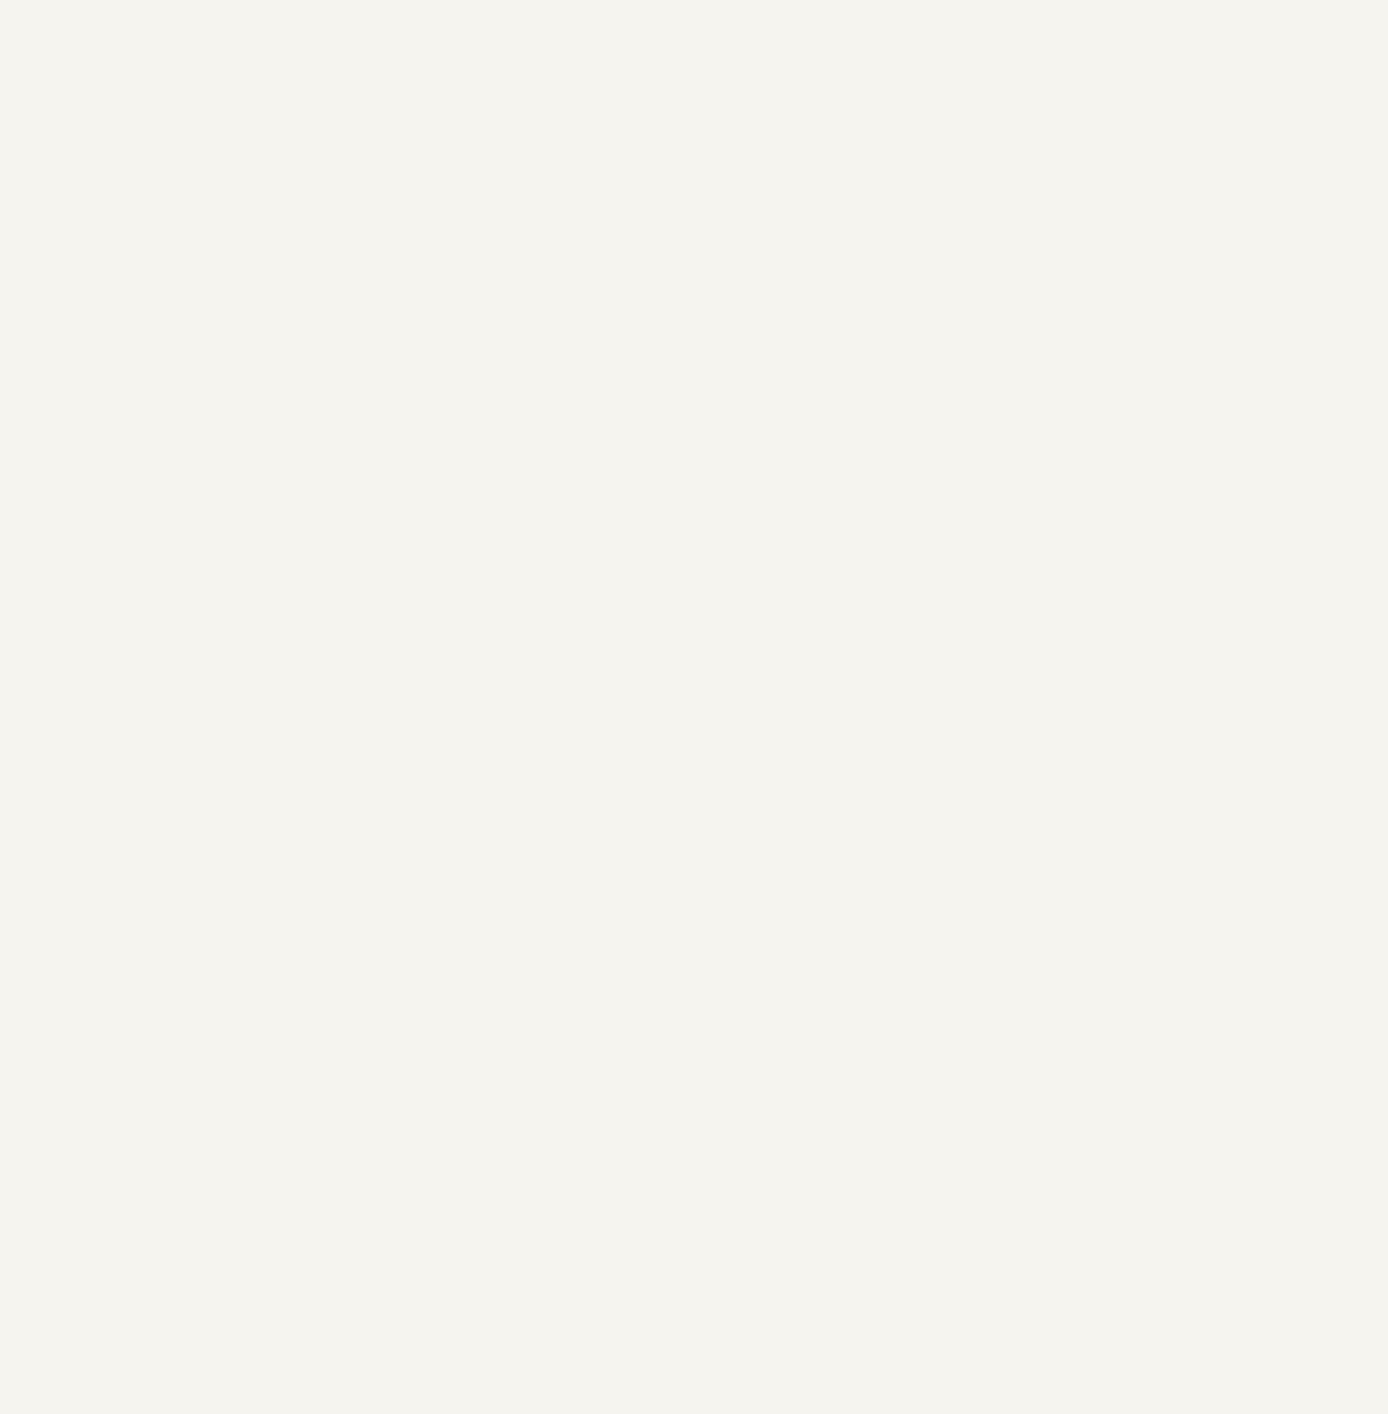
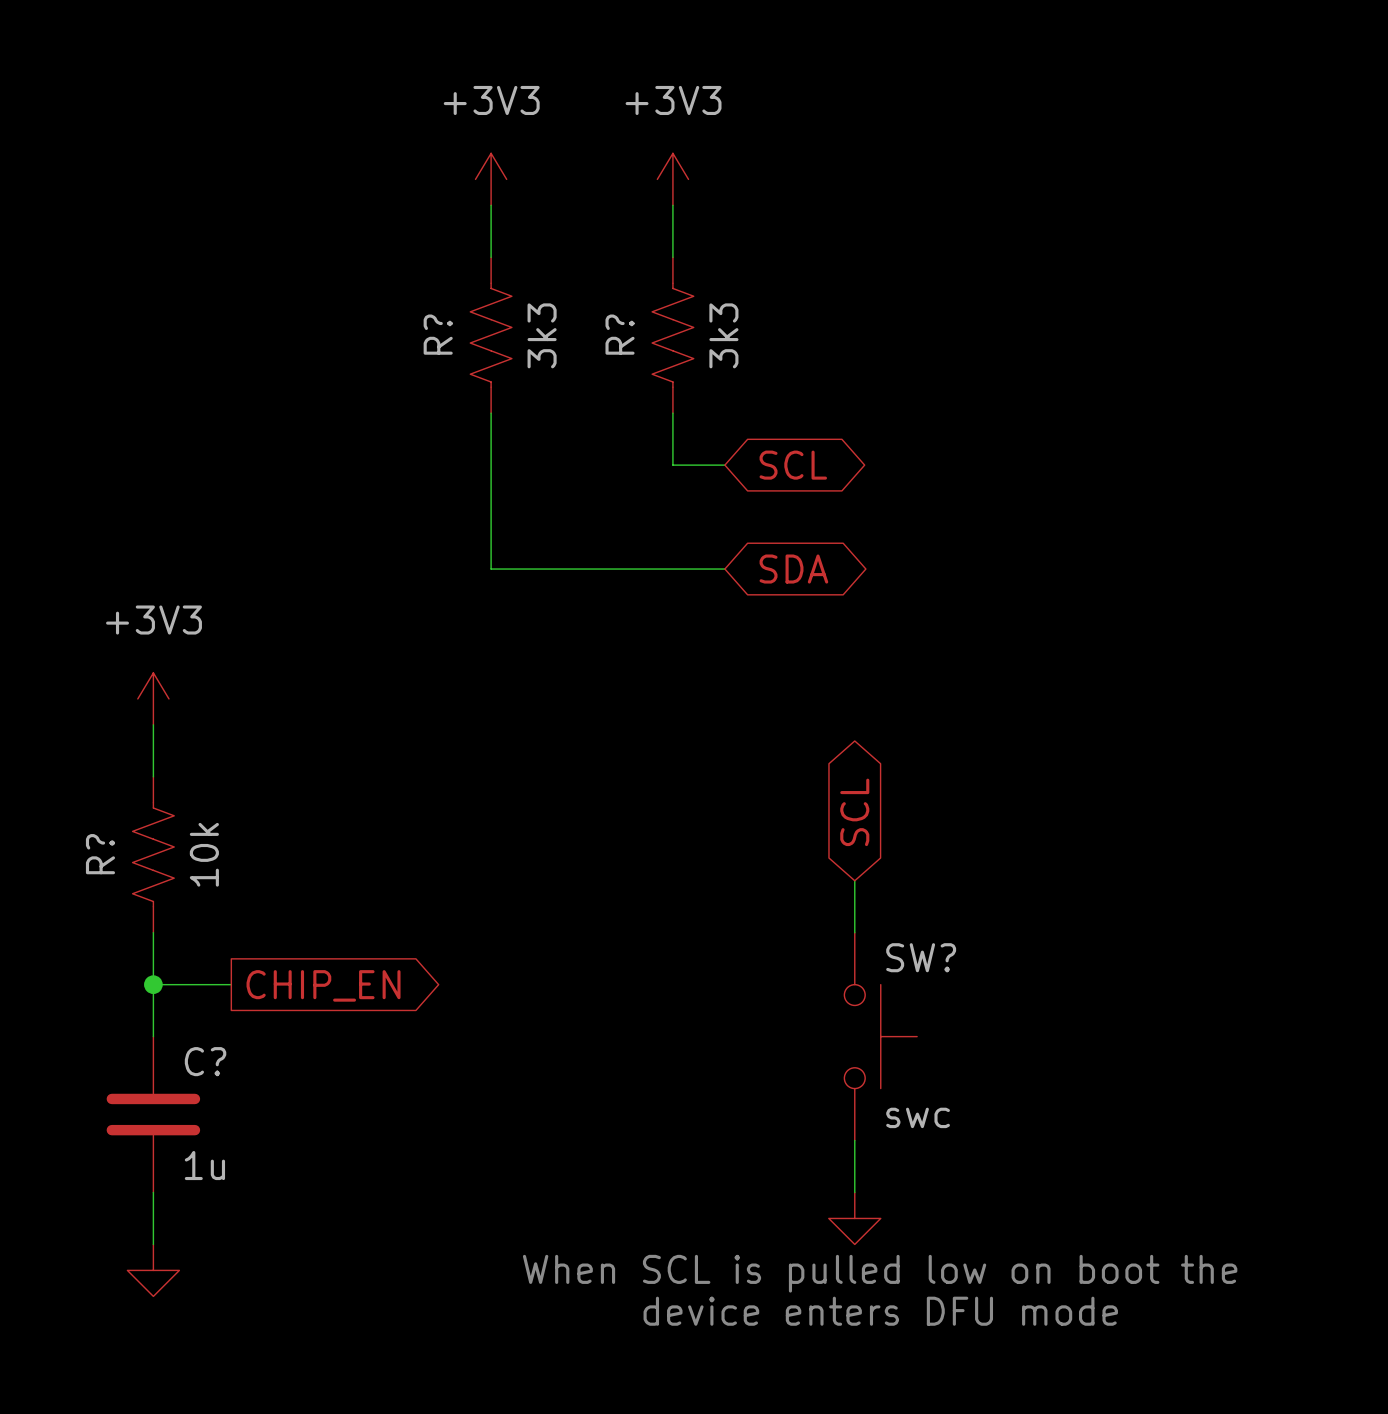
power symbol: none -> +3V3 (491, 179)
power symbol: none -> +3V3 (672, 179)
wire: none -> (491, 205) (491, 257)
wire: none -> (672, 205) (672, 257)
R?: none -> 3k3 (491, 335)
R?: none -> 3k3 (672, 335)
wire: none -> (491, 413) (491, 569) (724, 569)
wire: none -> (672, 413) (672, 465) (724, 465)
global label: none -> SCL (793, 465)
global label: none -> SDA (793, 569)
power symbol: none -> +3V3 (153, 698)
wire: none -> (153, 724) (153, 776)
global label: none -> SCL (854, 812)
R?: none -> 10k (153, 854)
wire: none -> (854, 880) (854, 932)
wire: none -> (153, 932) (153, 1036)
wire: none -> (153, 984) (231, 984)
junction: none -> (153, 984)
global label: none -> CHIP_EN (323, 985)
SW?: none -> swc (880, 1036)
C?: none -> 1u (153, 1114)
wire: none -> (854, 1140) (854, 1192)
wire: none -> (153, 1192) (153, 1244)
power symbol: none -> (854, 1218)
power symbol: none -> (153, 1270)
text: none -> When SCL is pulled low on boot the (880, 1273)
text: none -> device enters DFU mode (880, 1311)

